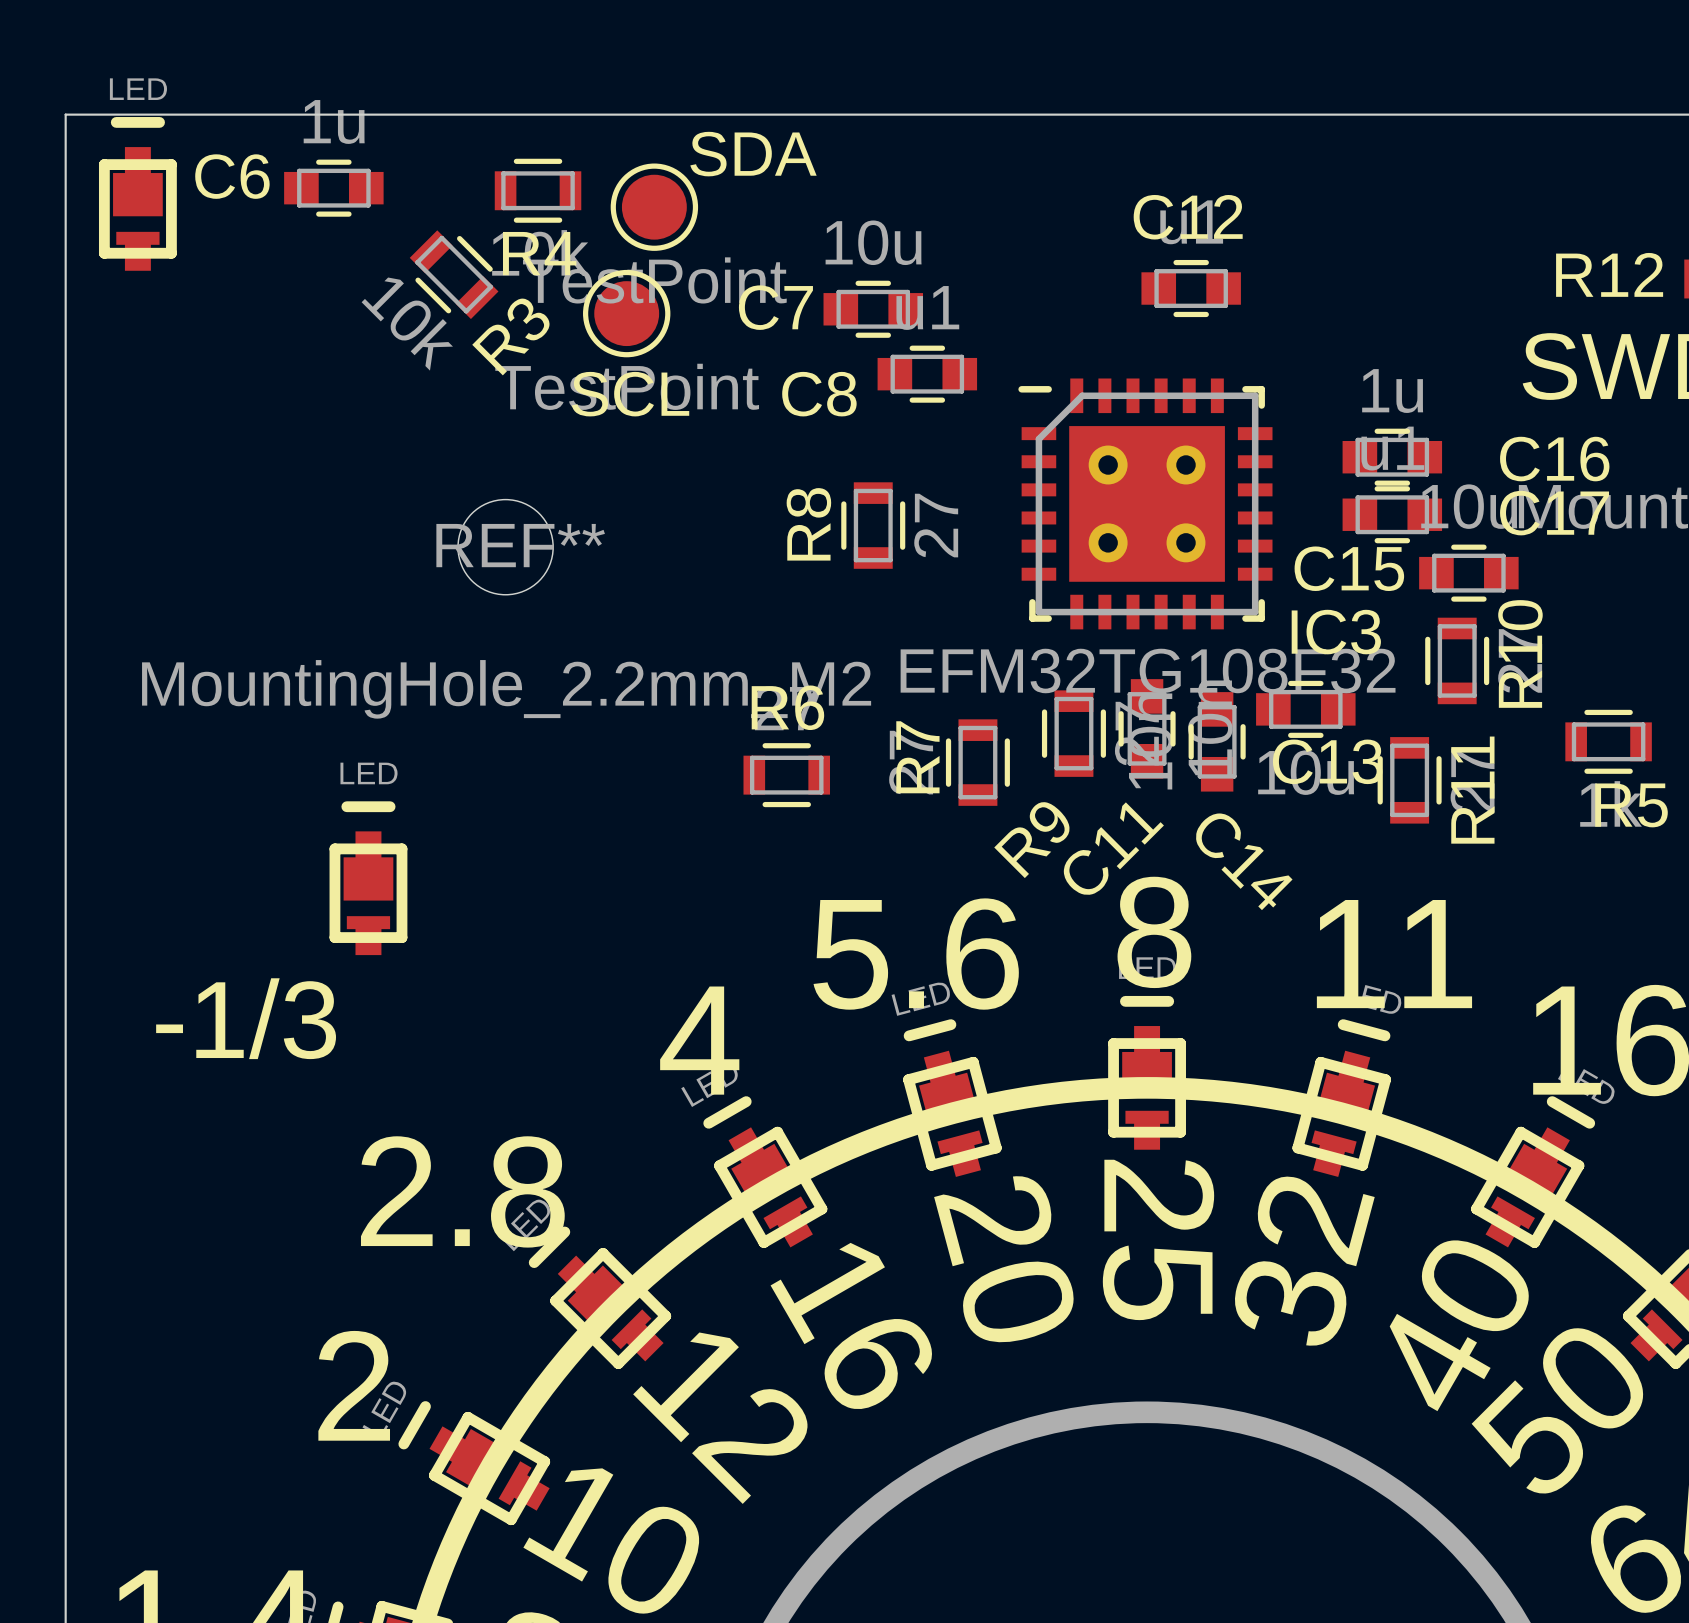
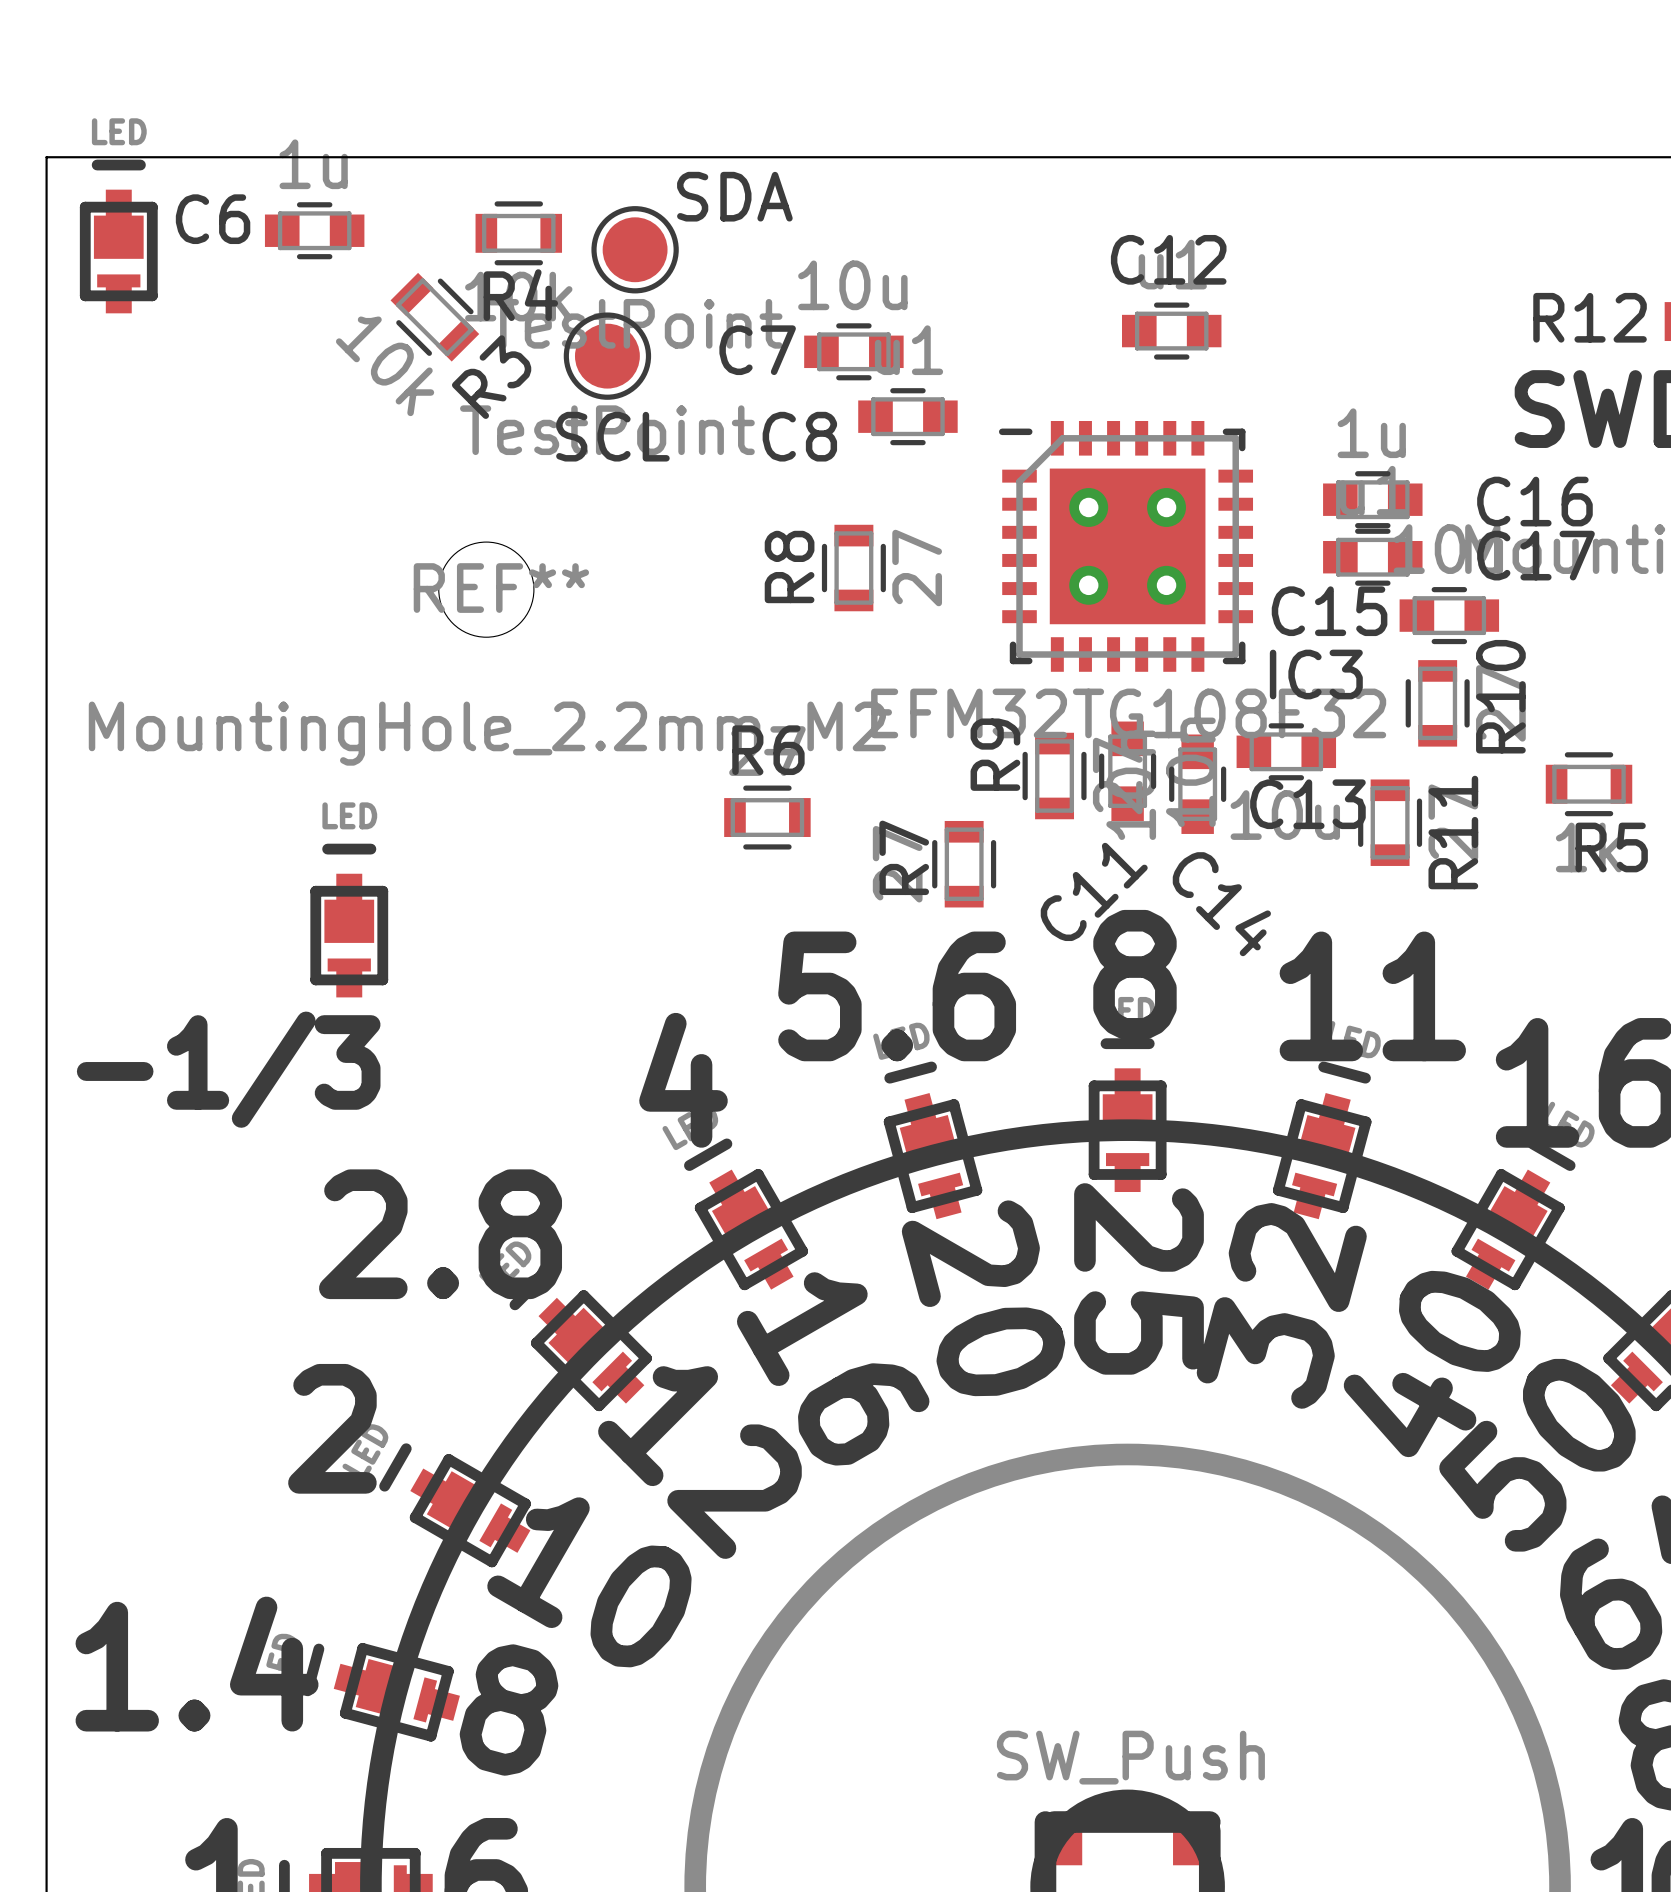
R7 position: (977, 762) -> (964, 864)
R9 name rotation: 0° (1032, 839) -> 45° counterclockwise (995, 754)

